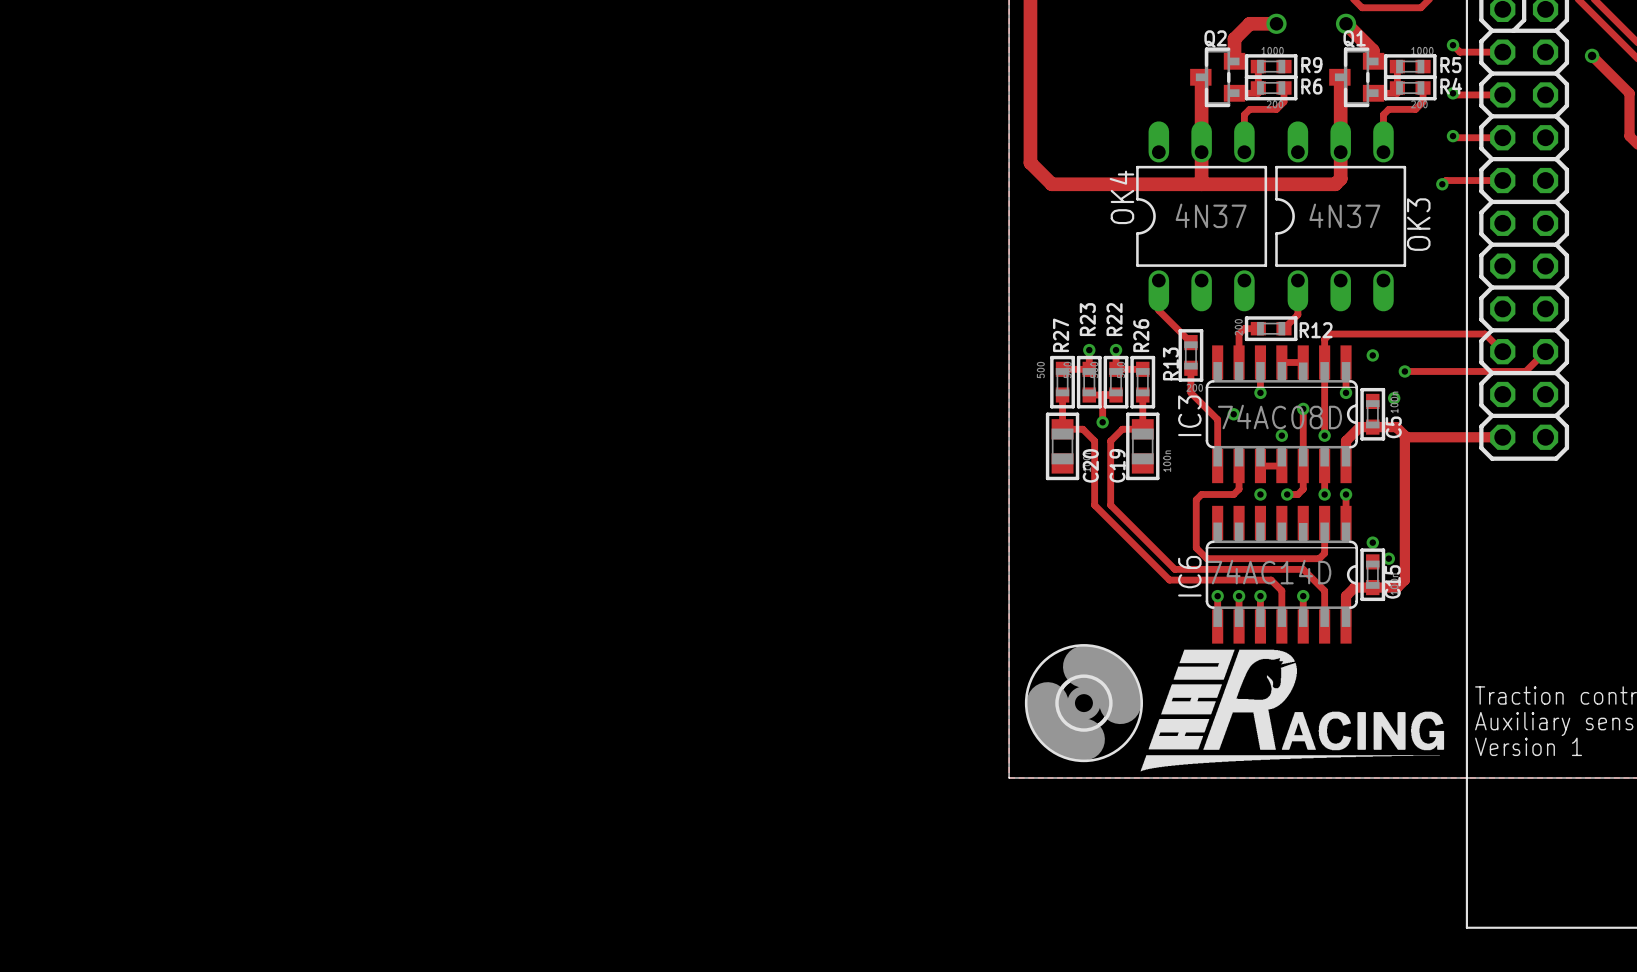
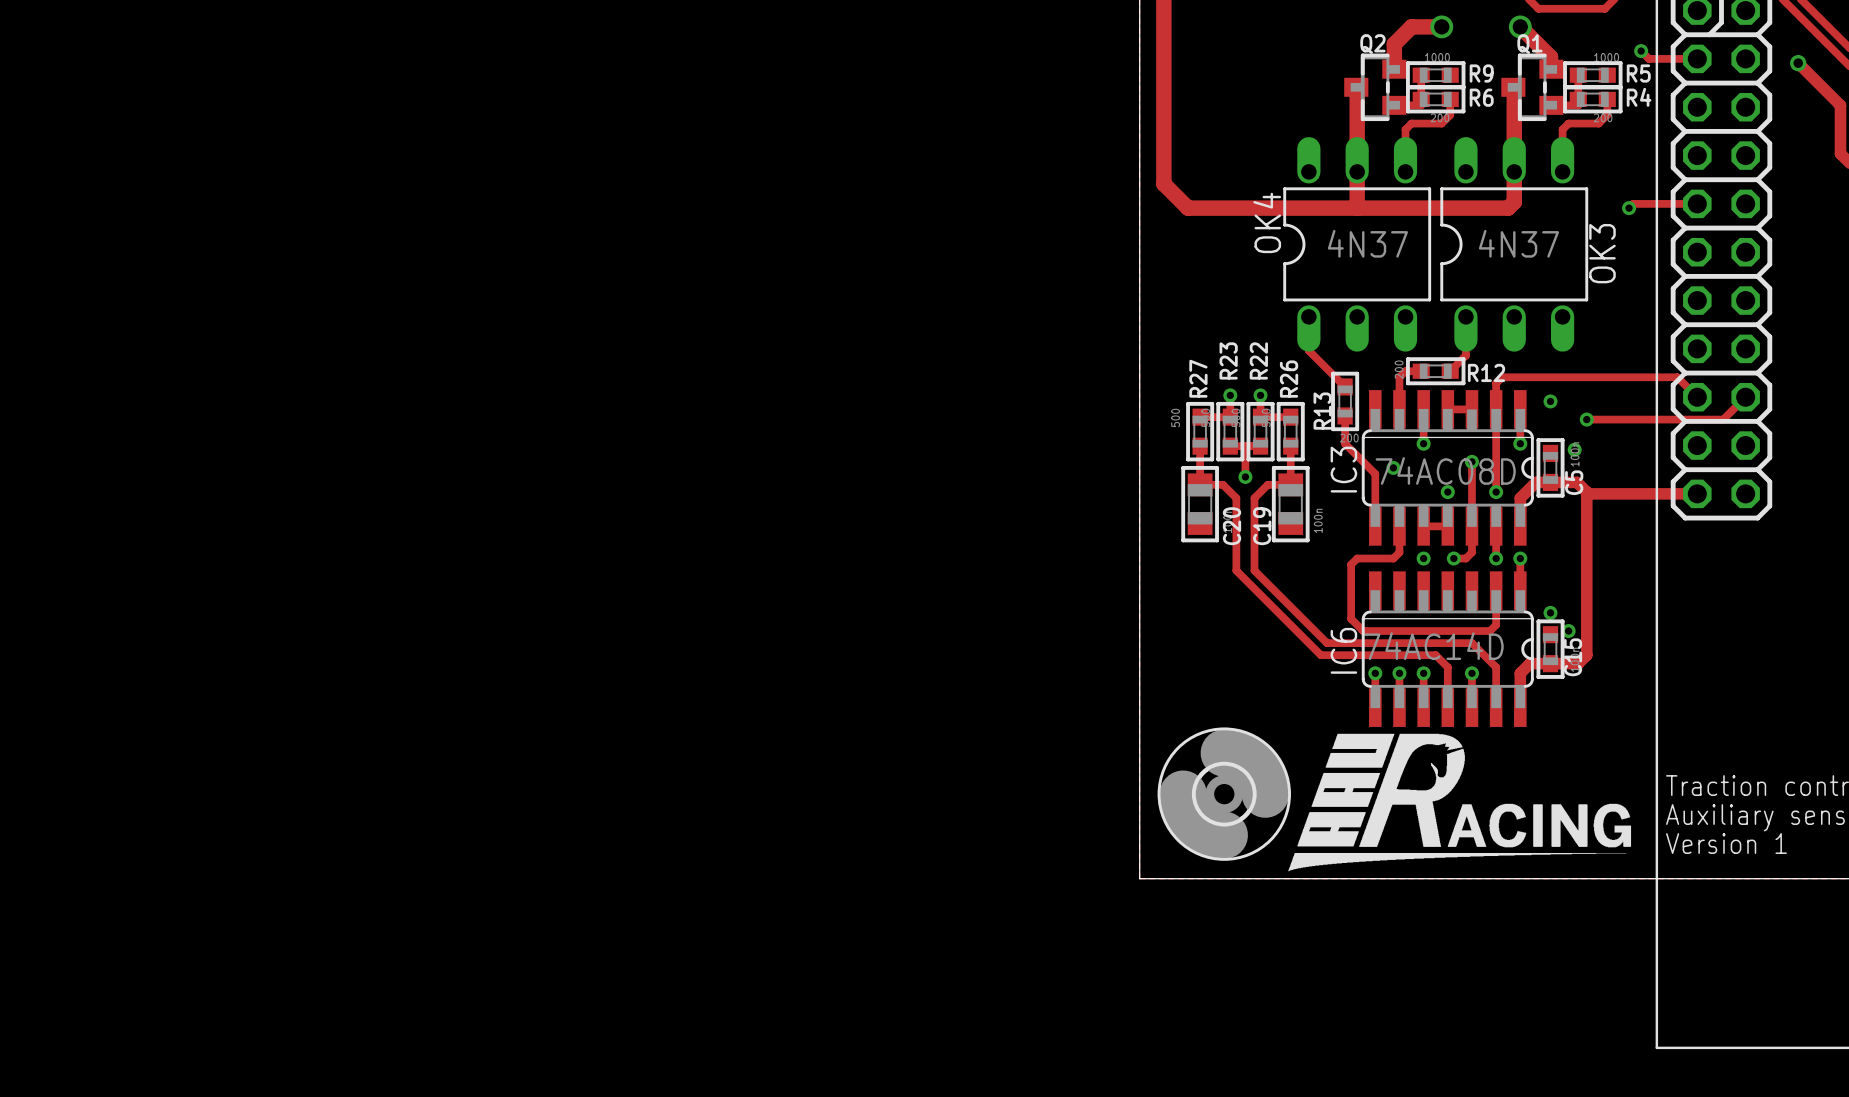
track: (1453, 93) (1454, 94) (1502, 94) -> none
via: (1453, 93) -> none
track: (1453, 136) (1454, 137) (1502, 137) -> none
via: (1453, 136) -> none

